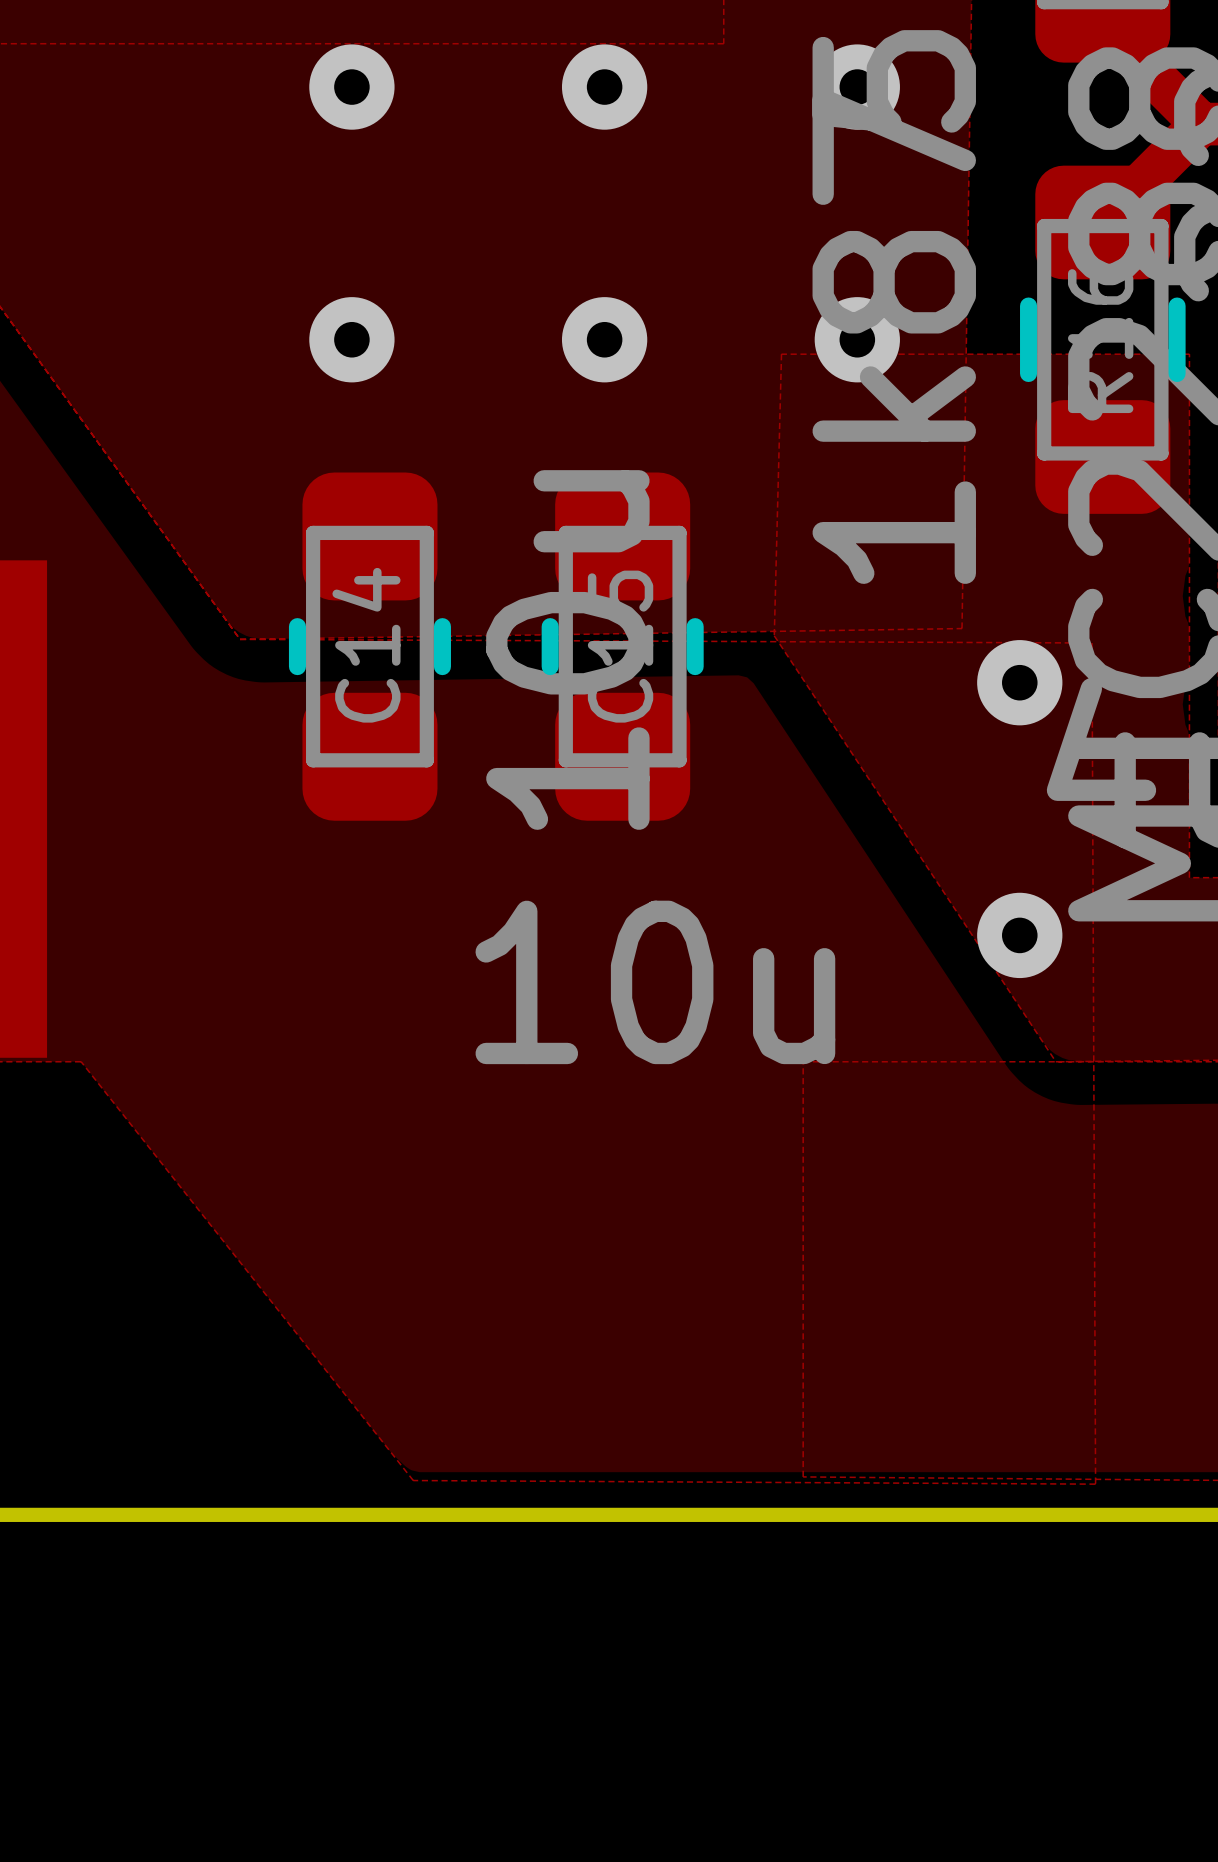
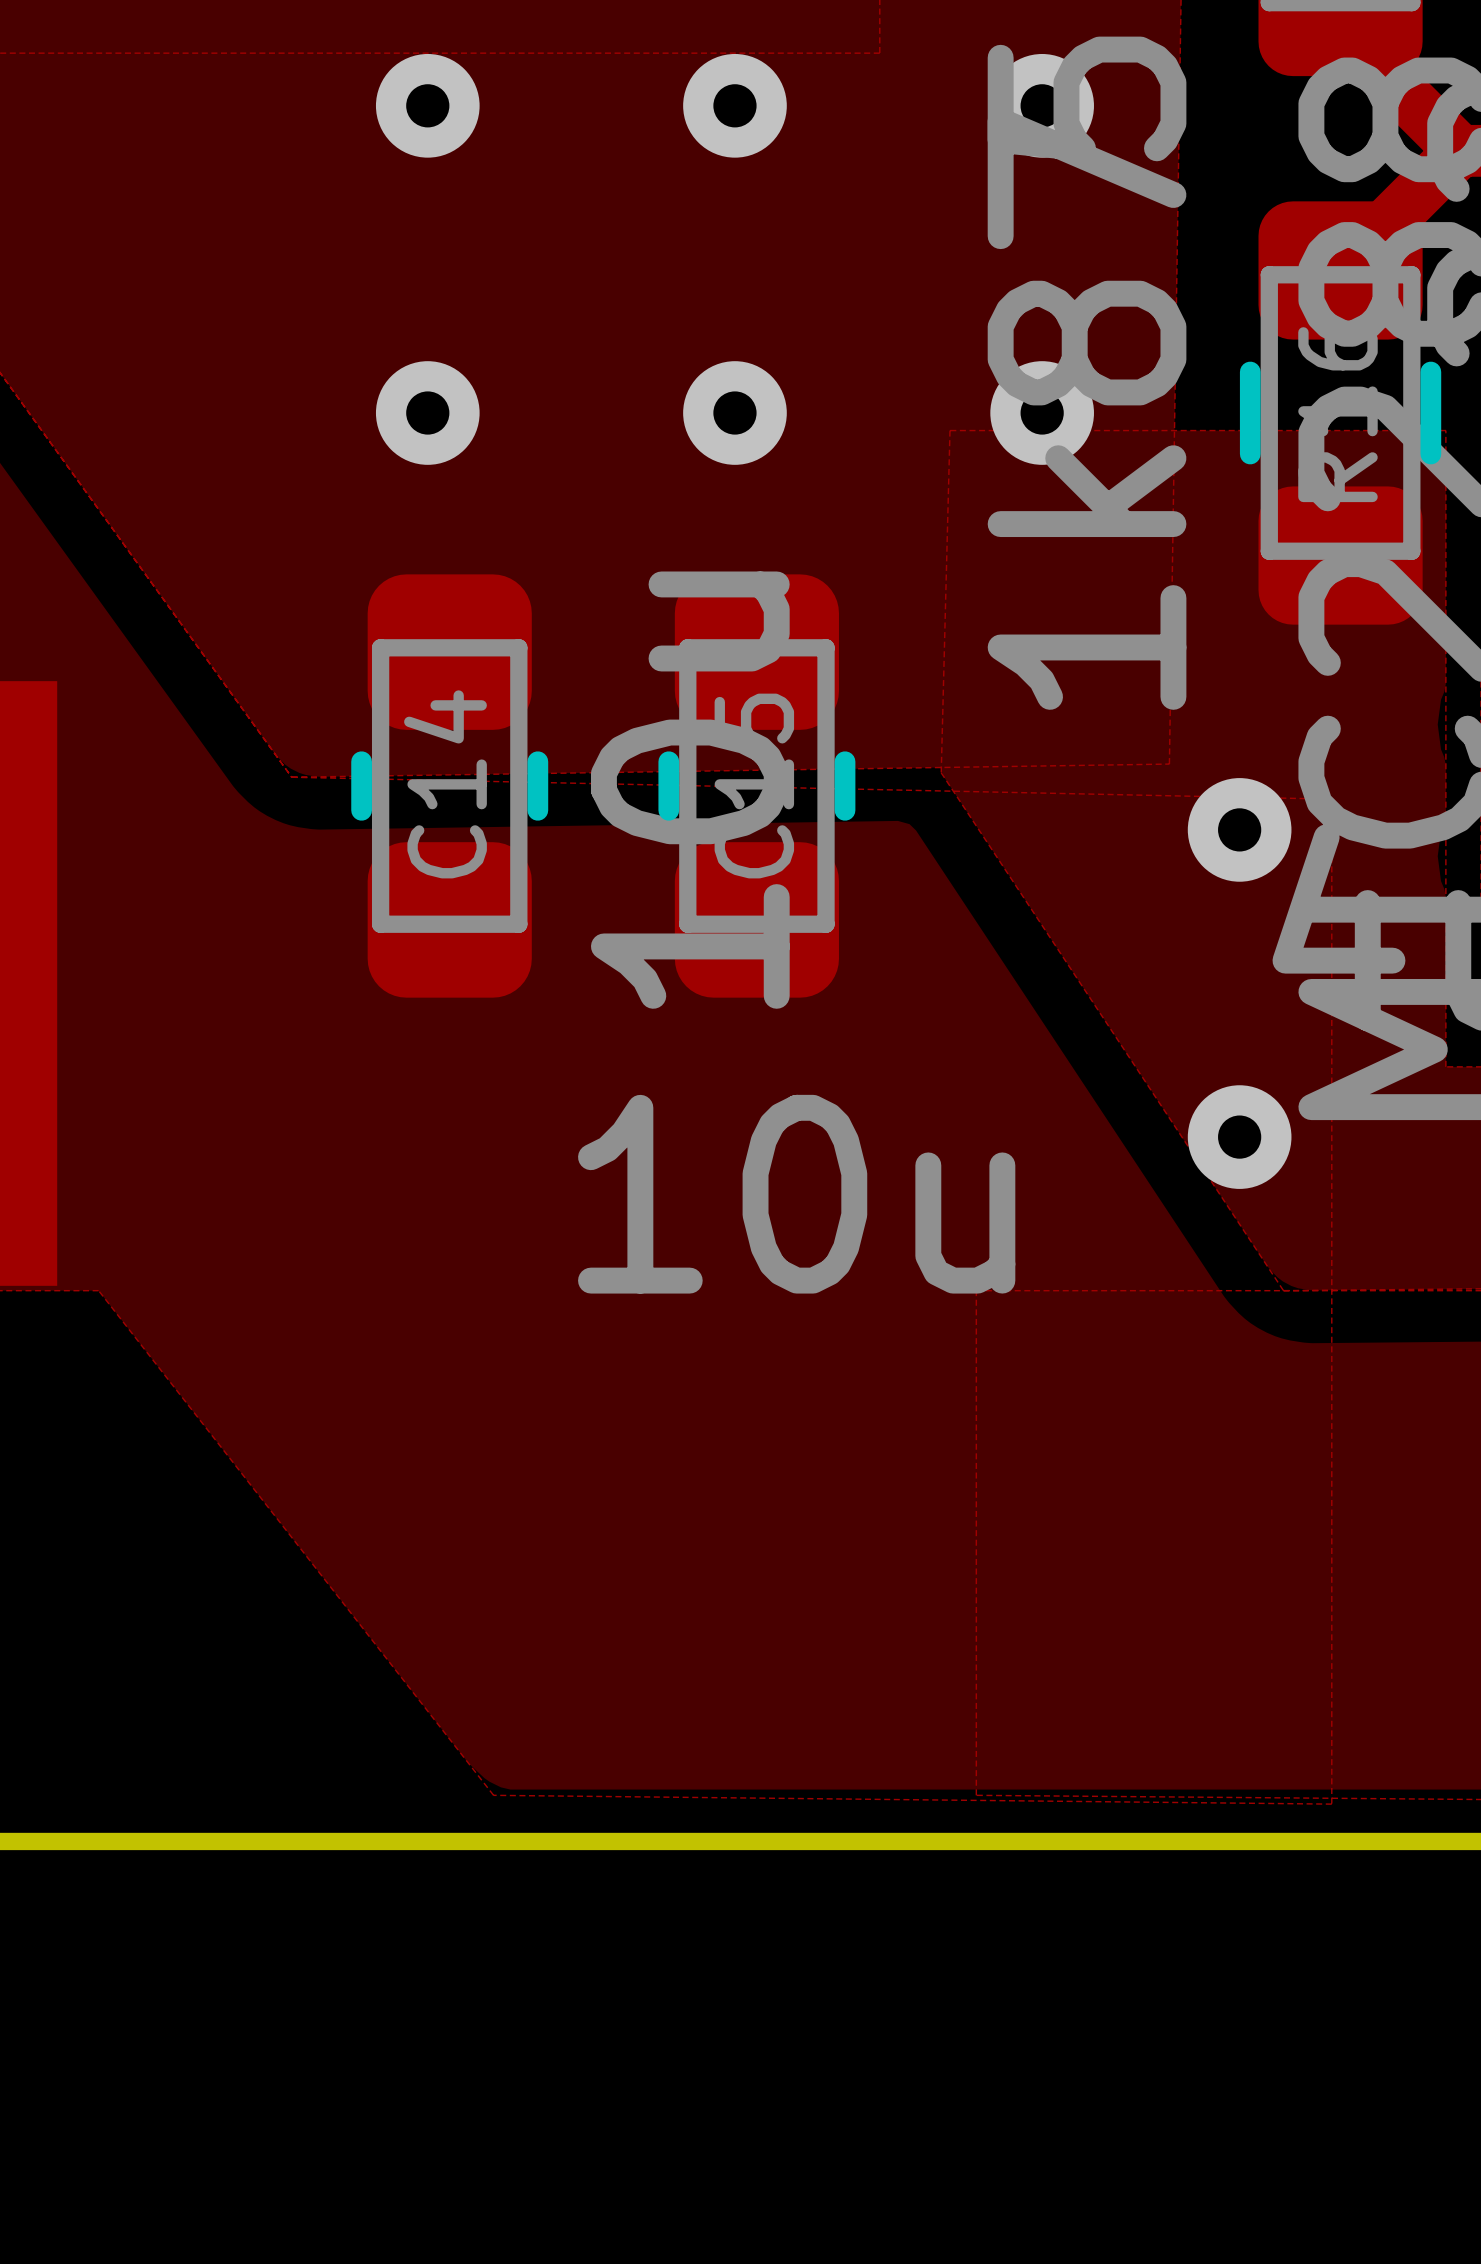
zone outline: (240, 639) (1091, 643) (1095, 1484) (413, 1480) (81, 1061) -> (291, 777) (1331, 799) (1331, 1804) (493, 1795) (98, 1290)

